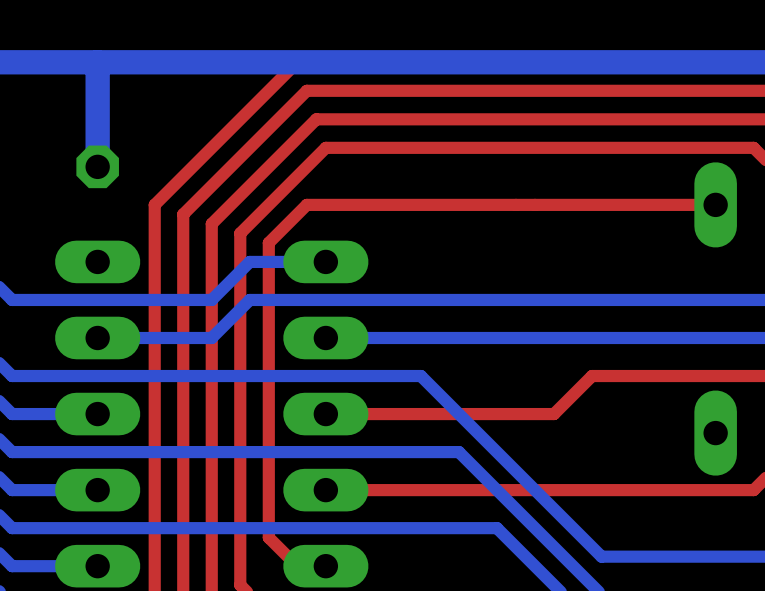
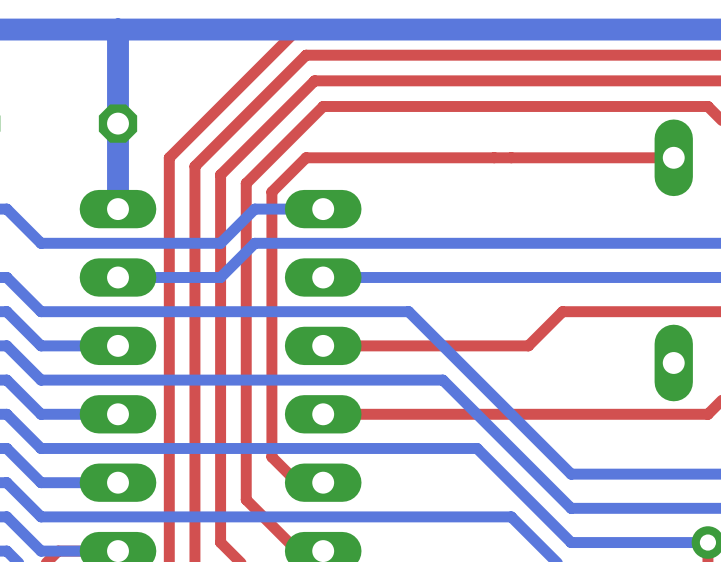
bottom track: none -> (118, 123) (118, 209)

